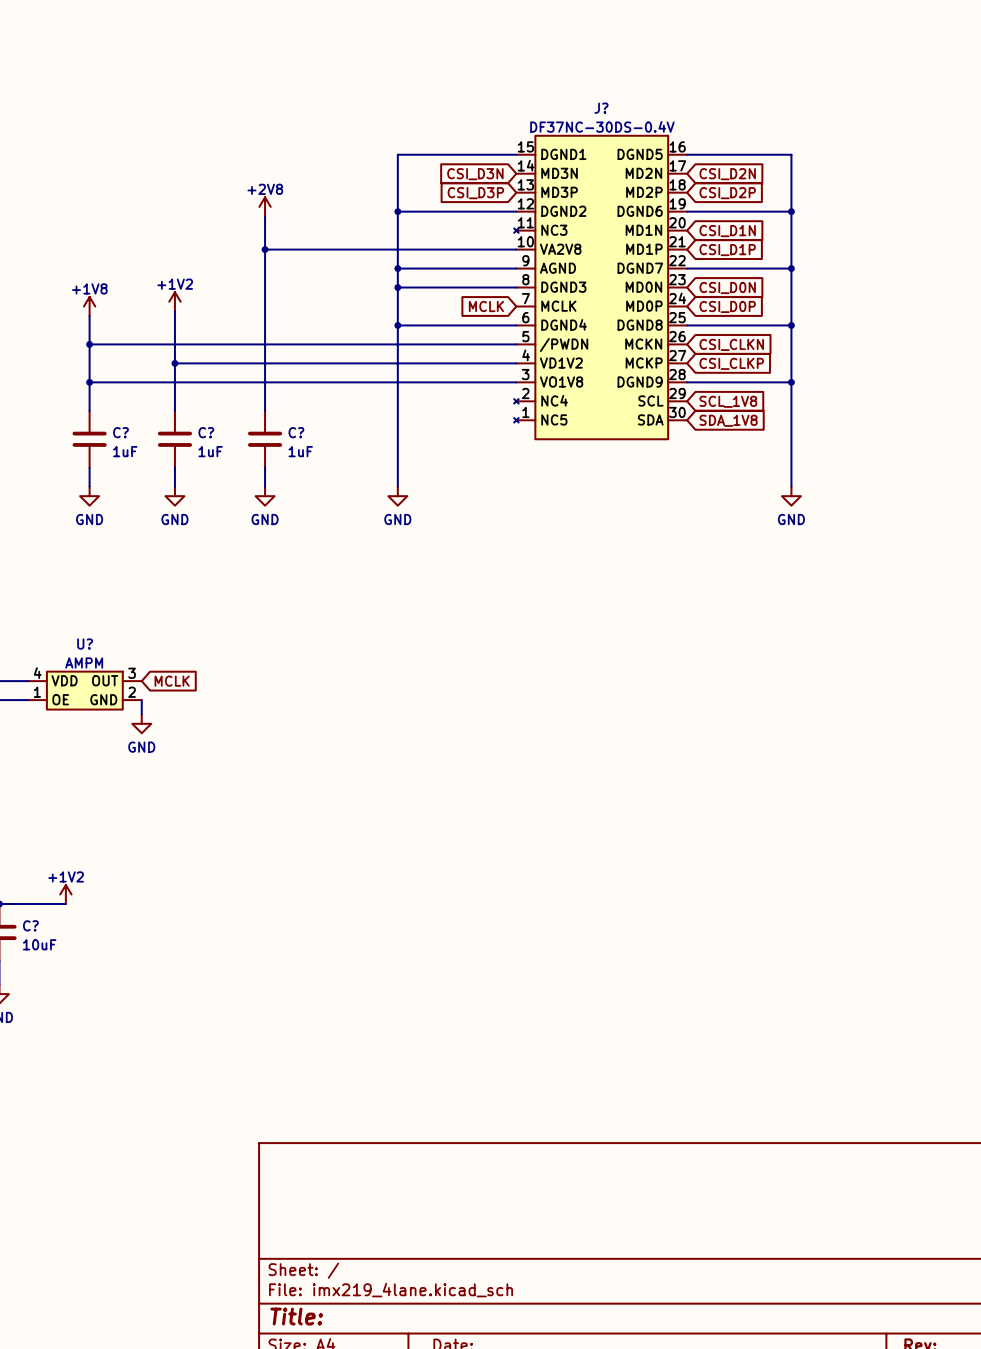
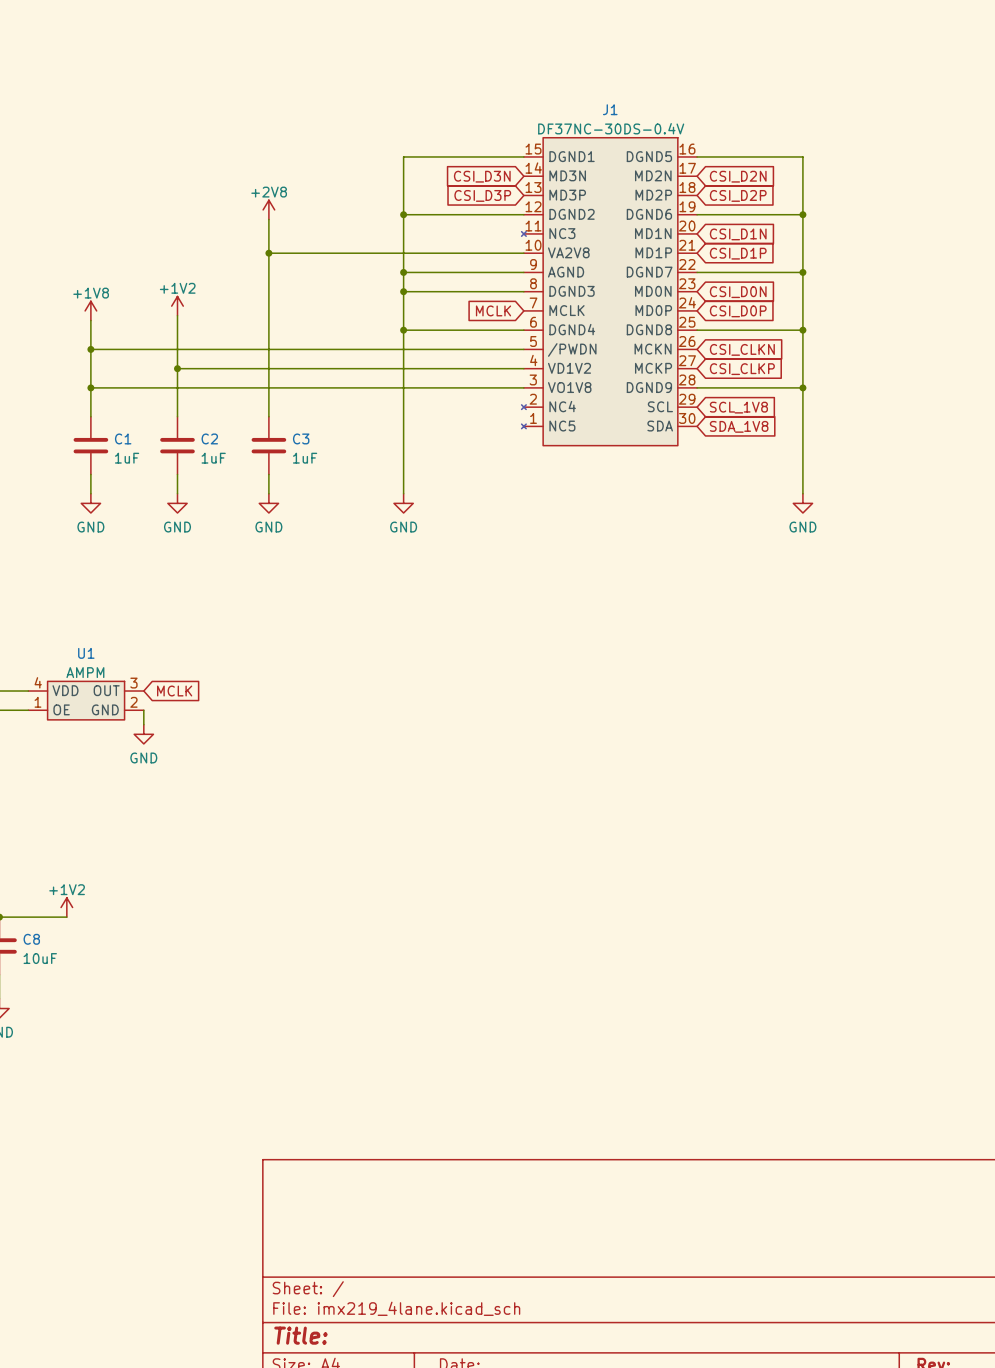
J? name: J? (601, 108) -> J1 (610, 109)
C? name: C? (120, 432) -> C1 (123, 438)
C? name: C? (206, 432) -> C2 (209, 438)
C? name: C? (296, 432) -> C3 (301, 438)
U? name: U? (85, 644) -> U1 (86, 653)
C? name: C? (30, 925) -> C8 (31, 939)

